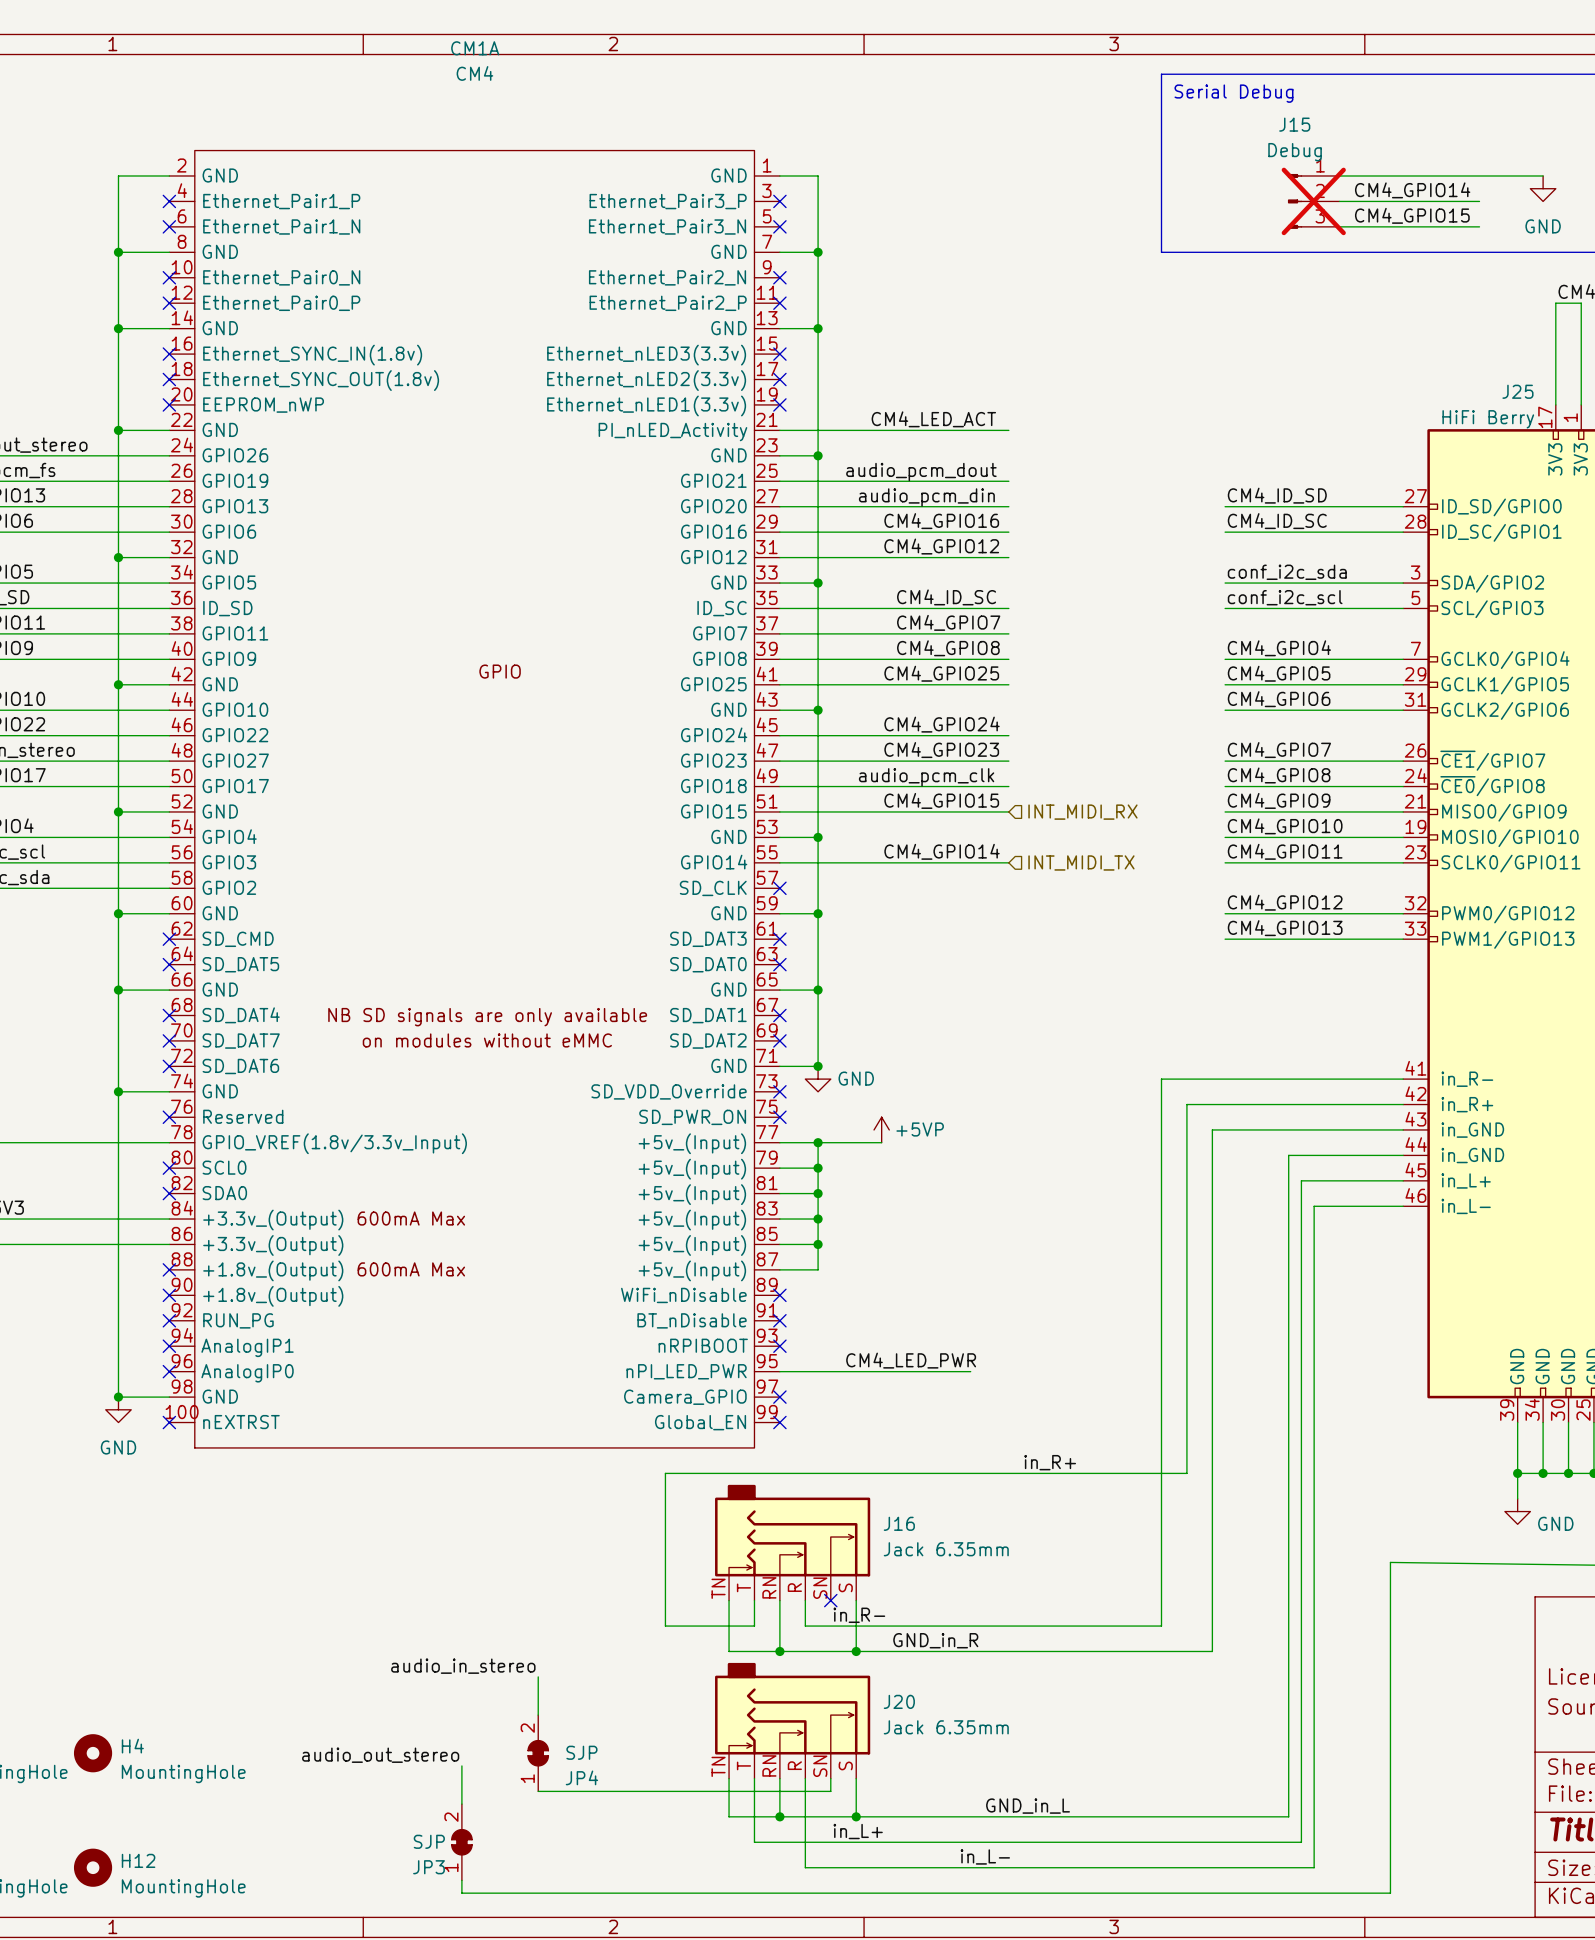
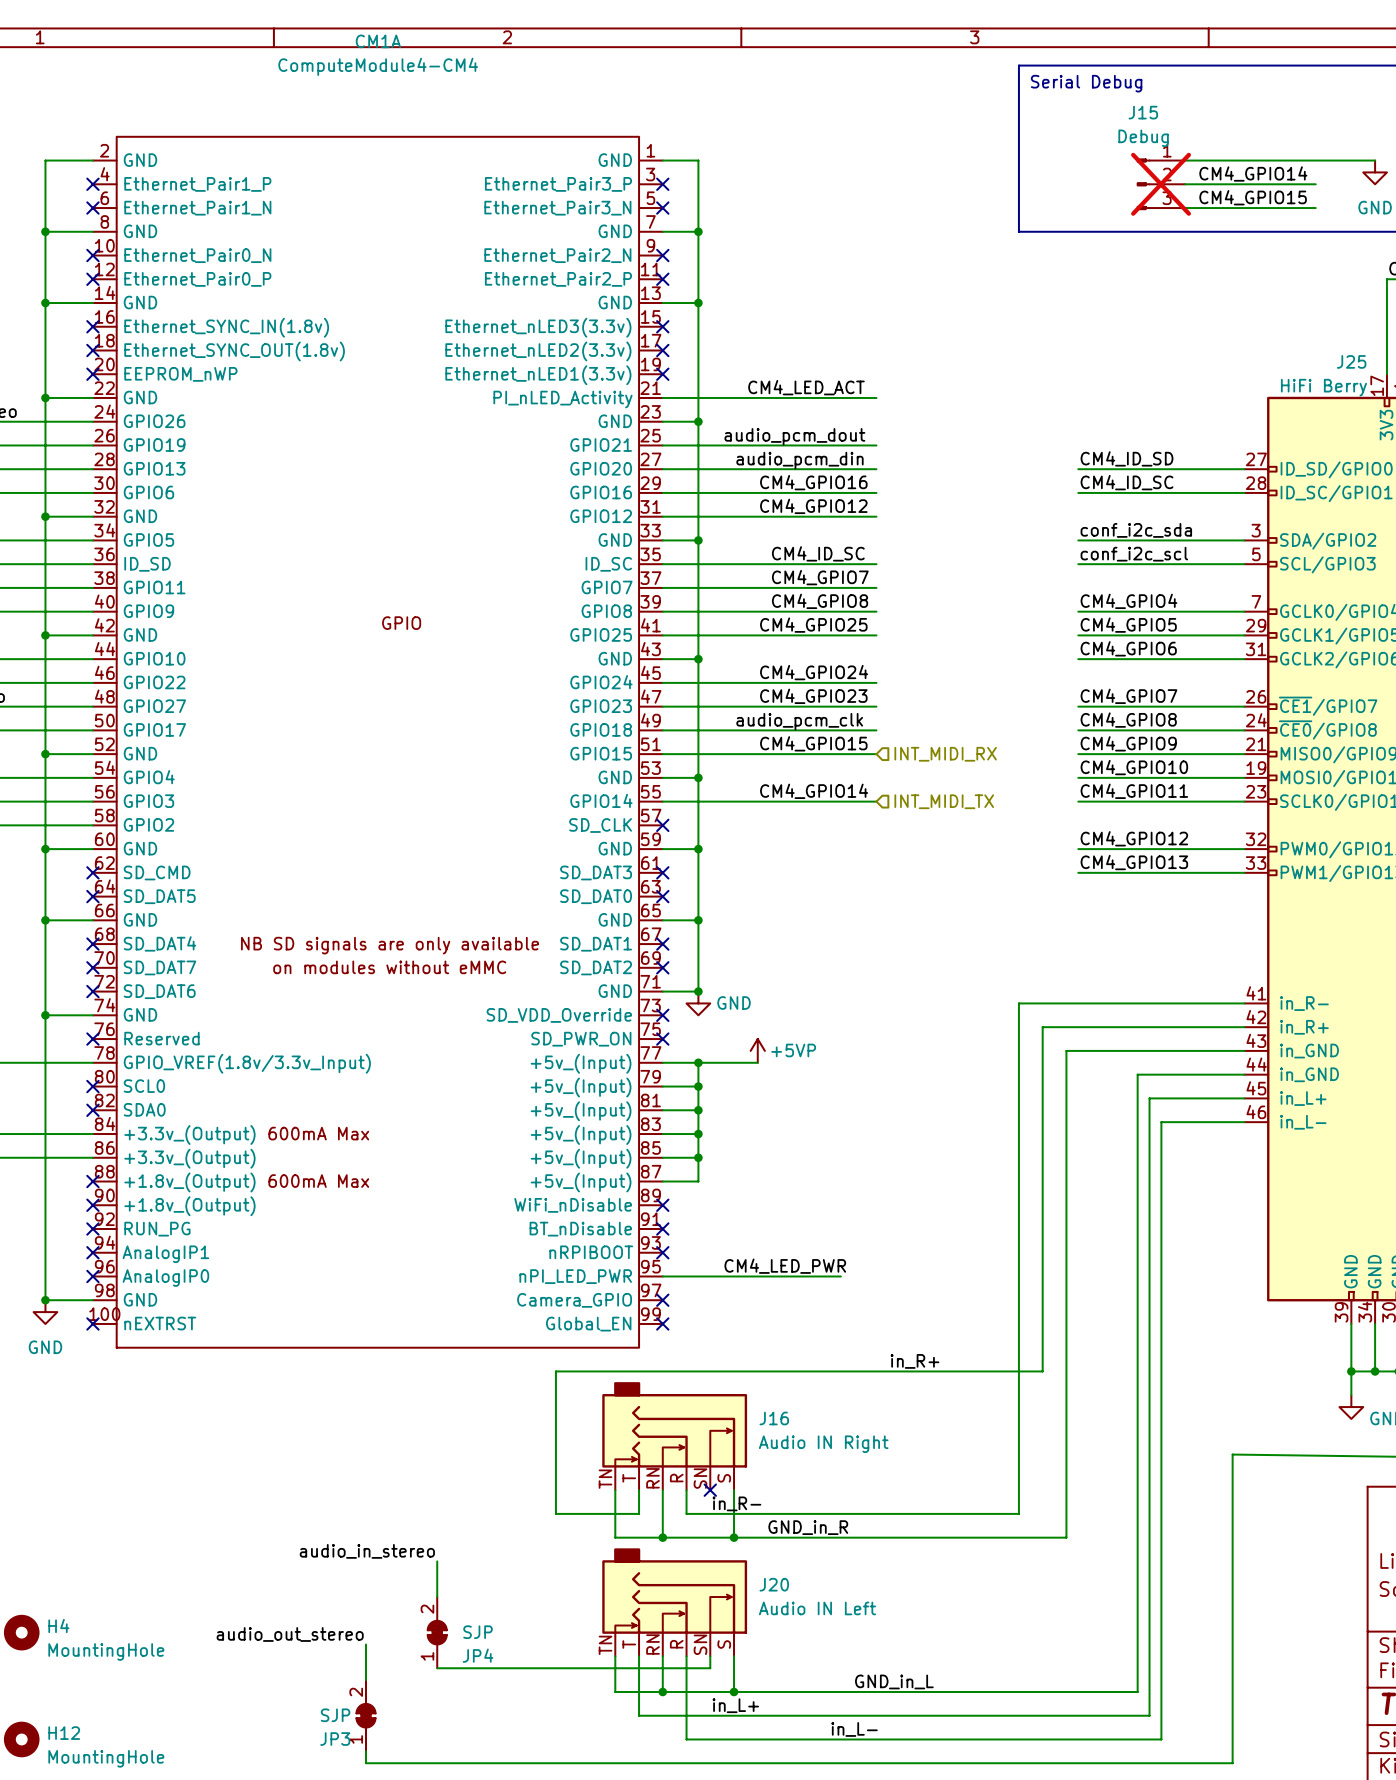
CM1A value: CM4 (474, 73) -> ComputeModule4-CM4 (378, 66)
J16 value: Jack 6.35mm (946, 1549) -> Audio IN Right (823, 1444)
J20 value: Jack 6.35mm (946, 1727) -> Audio IN Left (817, 1608)

